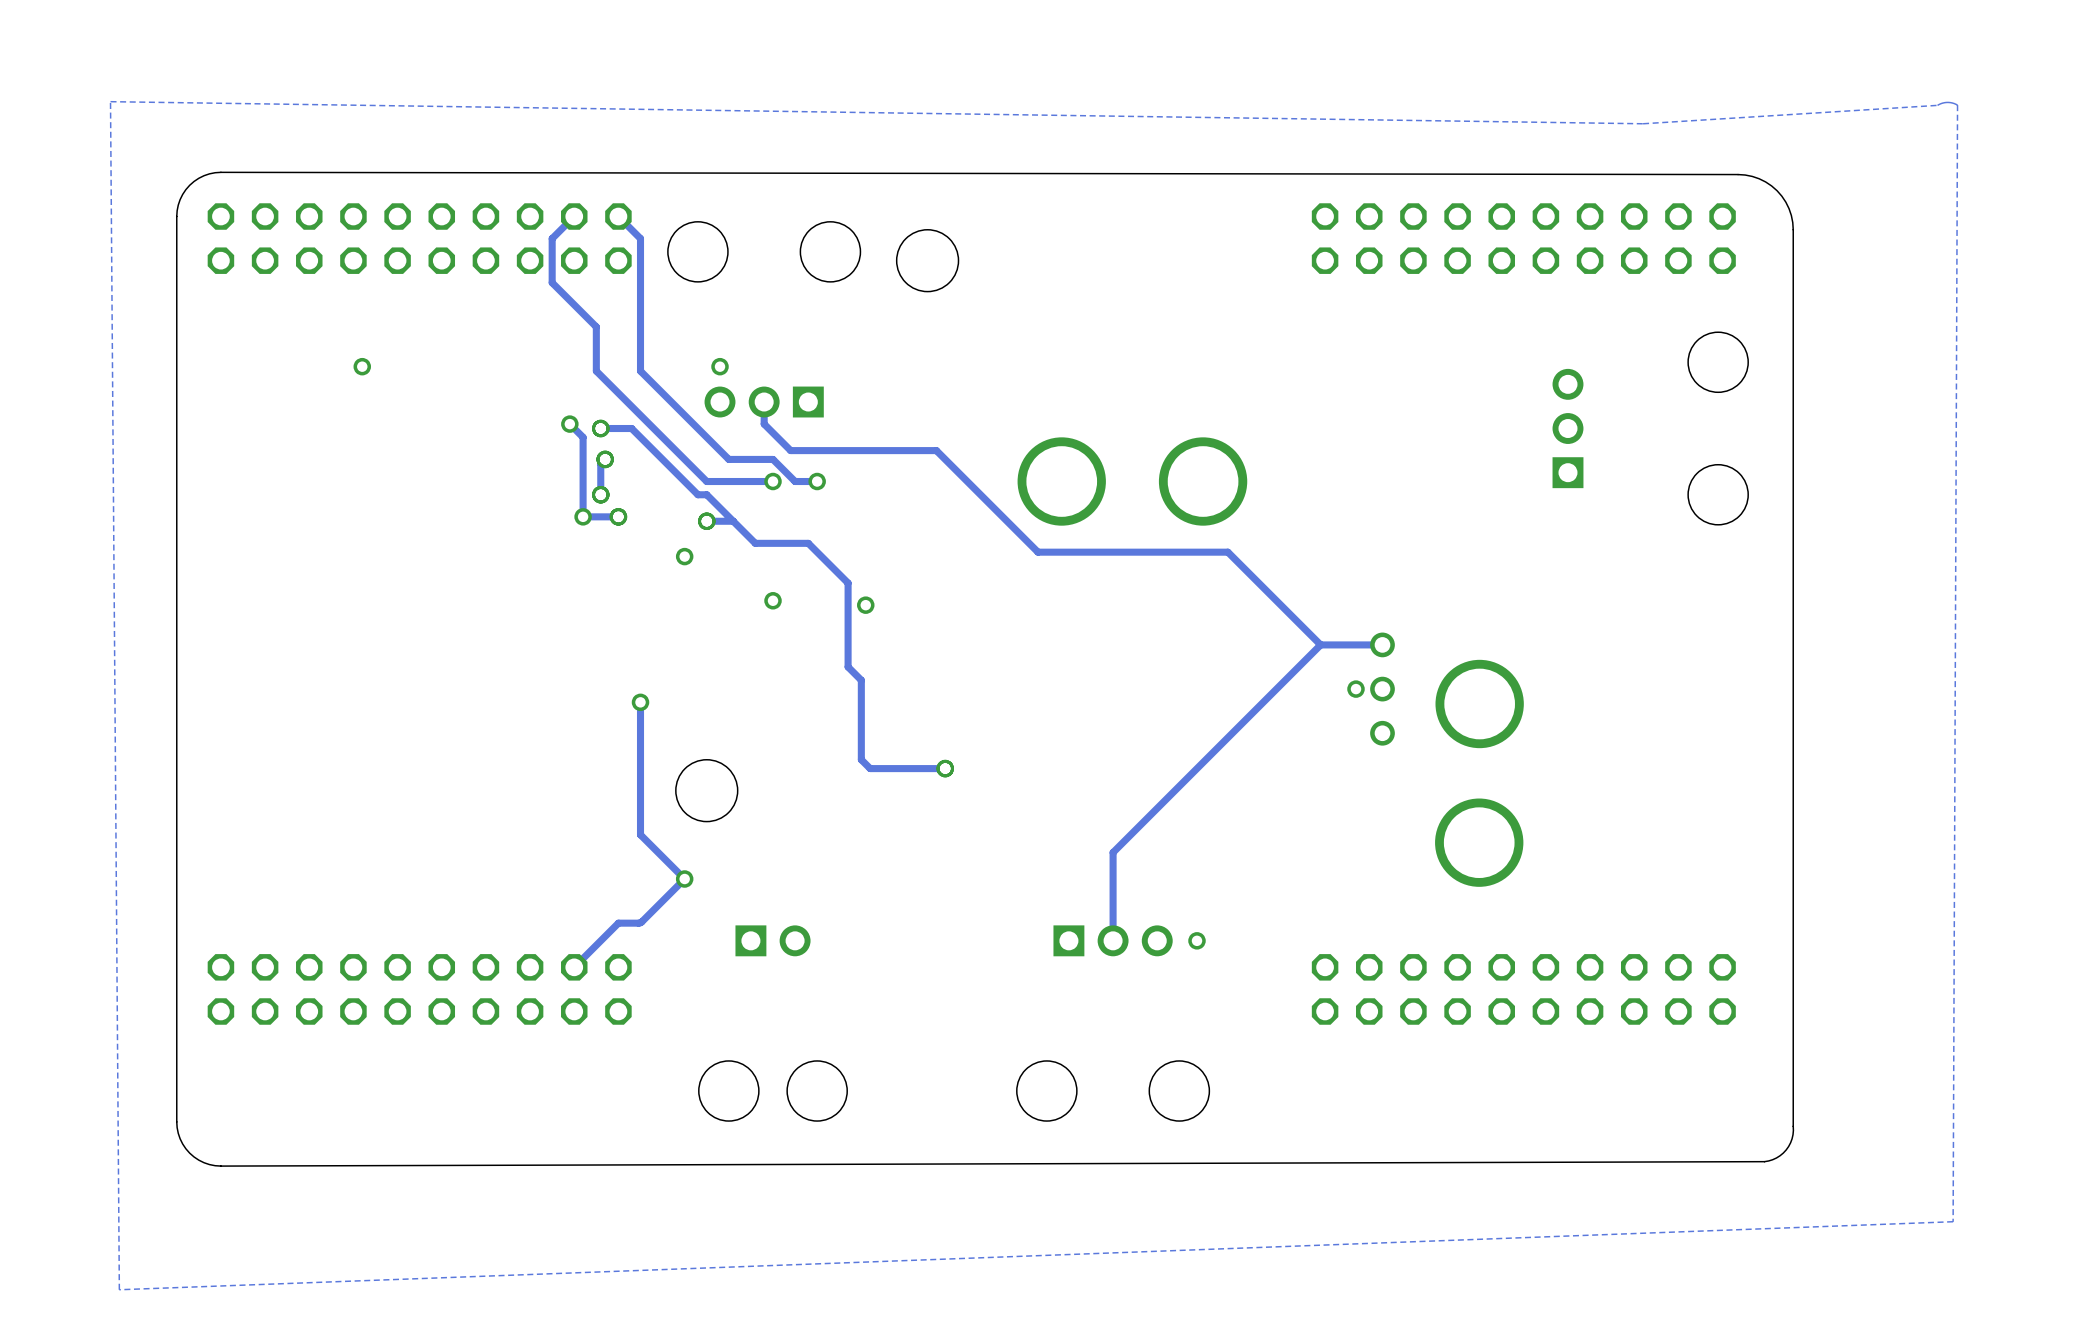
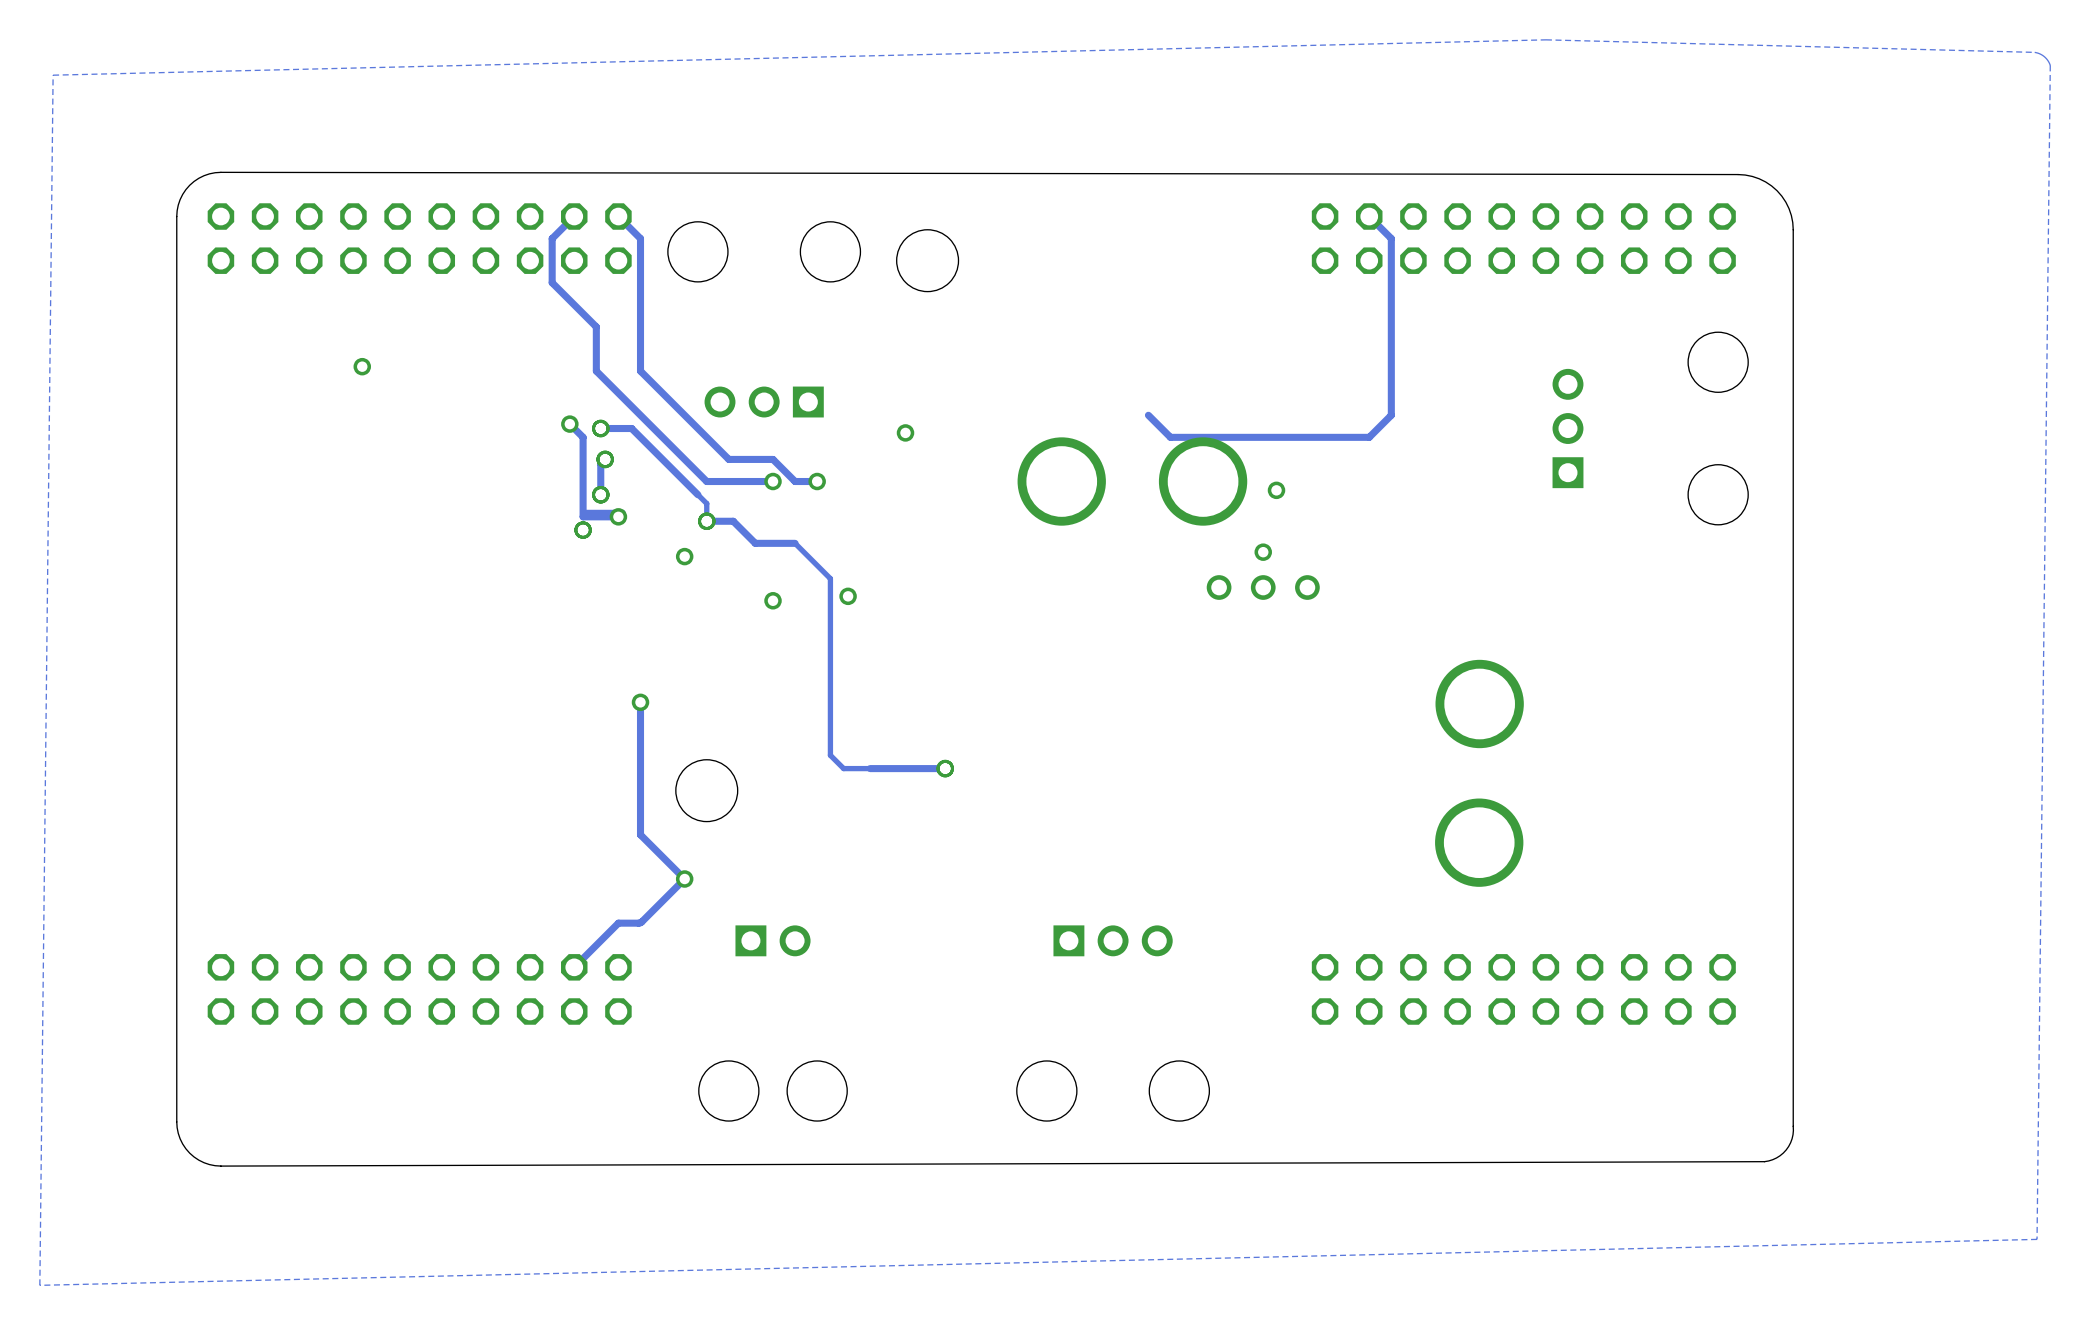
zone outline: (110, 101) (119, 1289) (1953, 1221) (1957, 105) (1947, 102) (1937, 105) (1643, 123) (110, 101) -> (1545, 39) (2034, 52) (2044, 56) (2049, 63) (2037, 1239) (39, 1285) (53, 75) (1545, 39)
track: none -> (1369, 216) (1391, 238) (1391, 415) (1369, 437) (1170, 437) (1148, 415)
via: (720, 366) -> none
track: (764, 402) (764, 424) (790, 450) (936, 450) (1038, 552) (1227, 552) (1320, 644) -> none
via: none -> (905, 432)
via: none -> (1276, 490)
track: (697, 494) (706, 494) (733, 521) -> (697, 494) (706, 503) (706, 521)
track: none -> (622, 512) (583, 512)
via position: (583, 516) -> (583, 530)
track: (795, 543) (808, 543) (848, 583) (848, 667) (861, 680) (861, 759) (870, 768) -> (795, 543) (830, 578) (830, 755) (843, 768) (870, 768)
via: none -> (1263, 552)
via position: (865, 605) -> (848, 596)
track: (1320, 644) (1113, 852) (1113, 940) -> none
track: (1382, 644) (1320, 644) -> none
via: (1355, 689) -> none
part rotation: 0° (1382, 689) -> 90° clockwise (1263, 587)
part position: (1382, 689) -> (1263, 587)
via: (1197, 940) -> none

